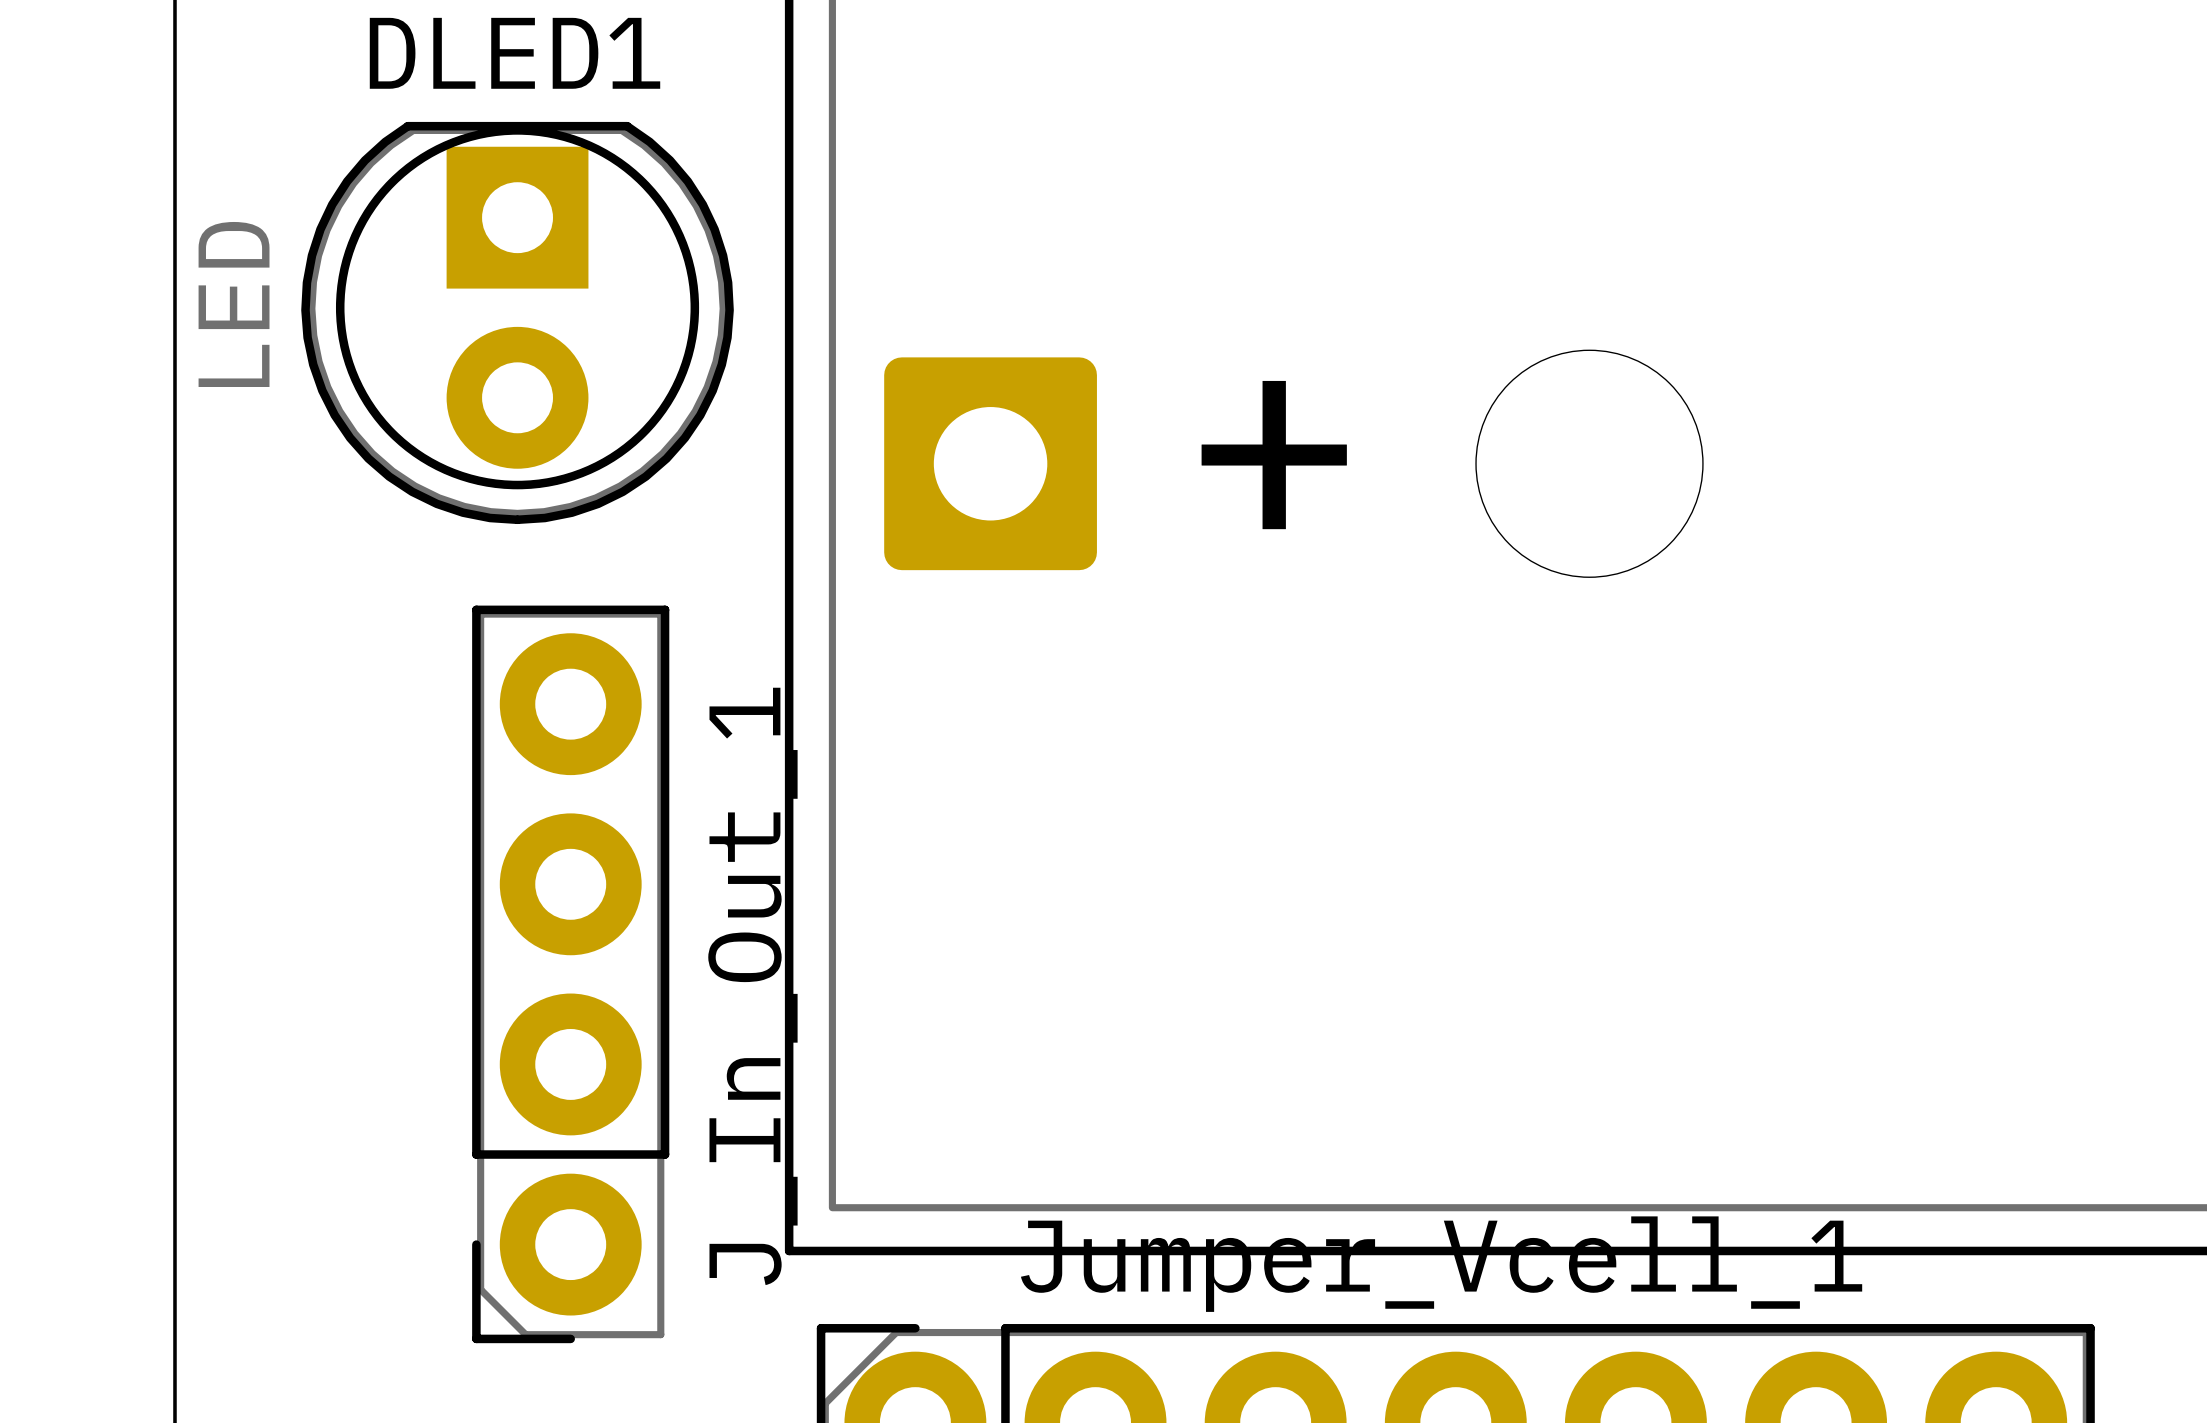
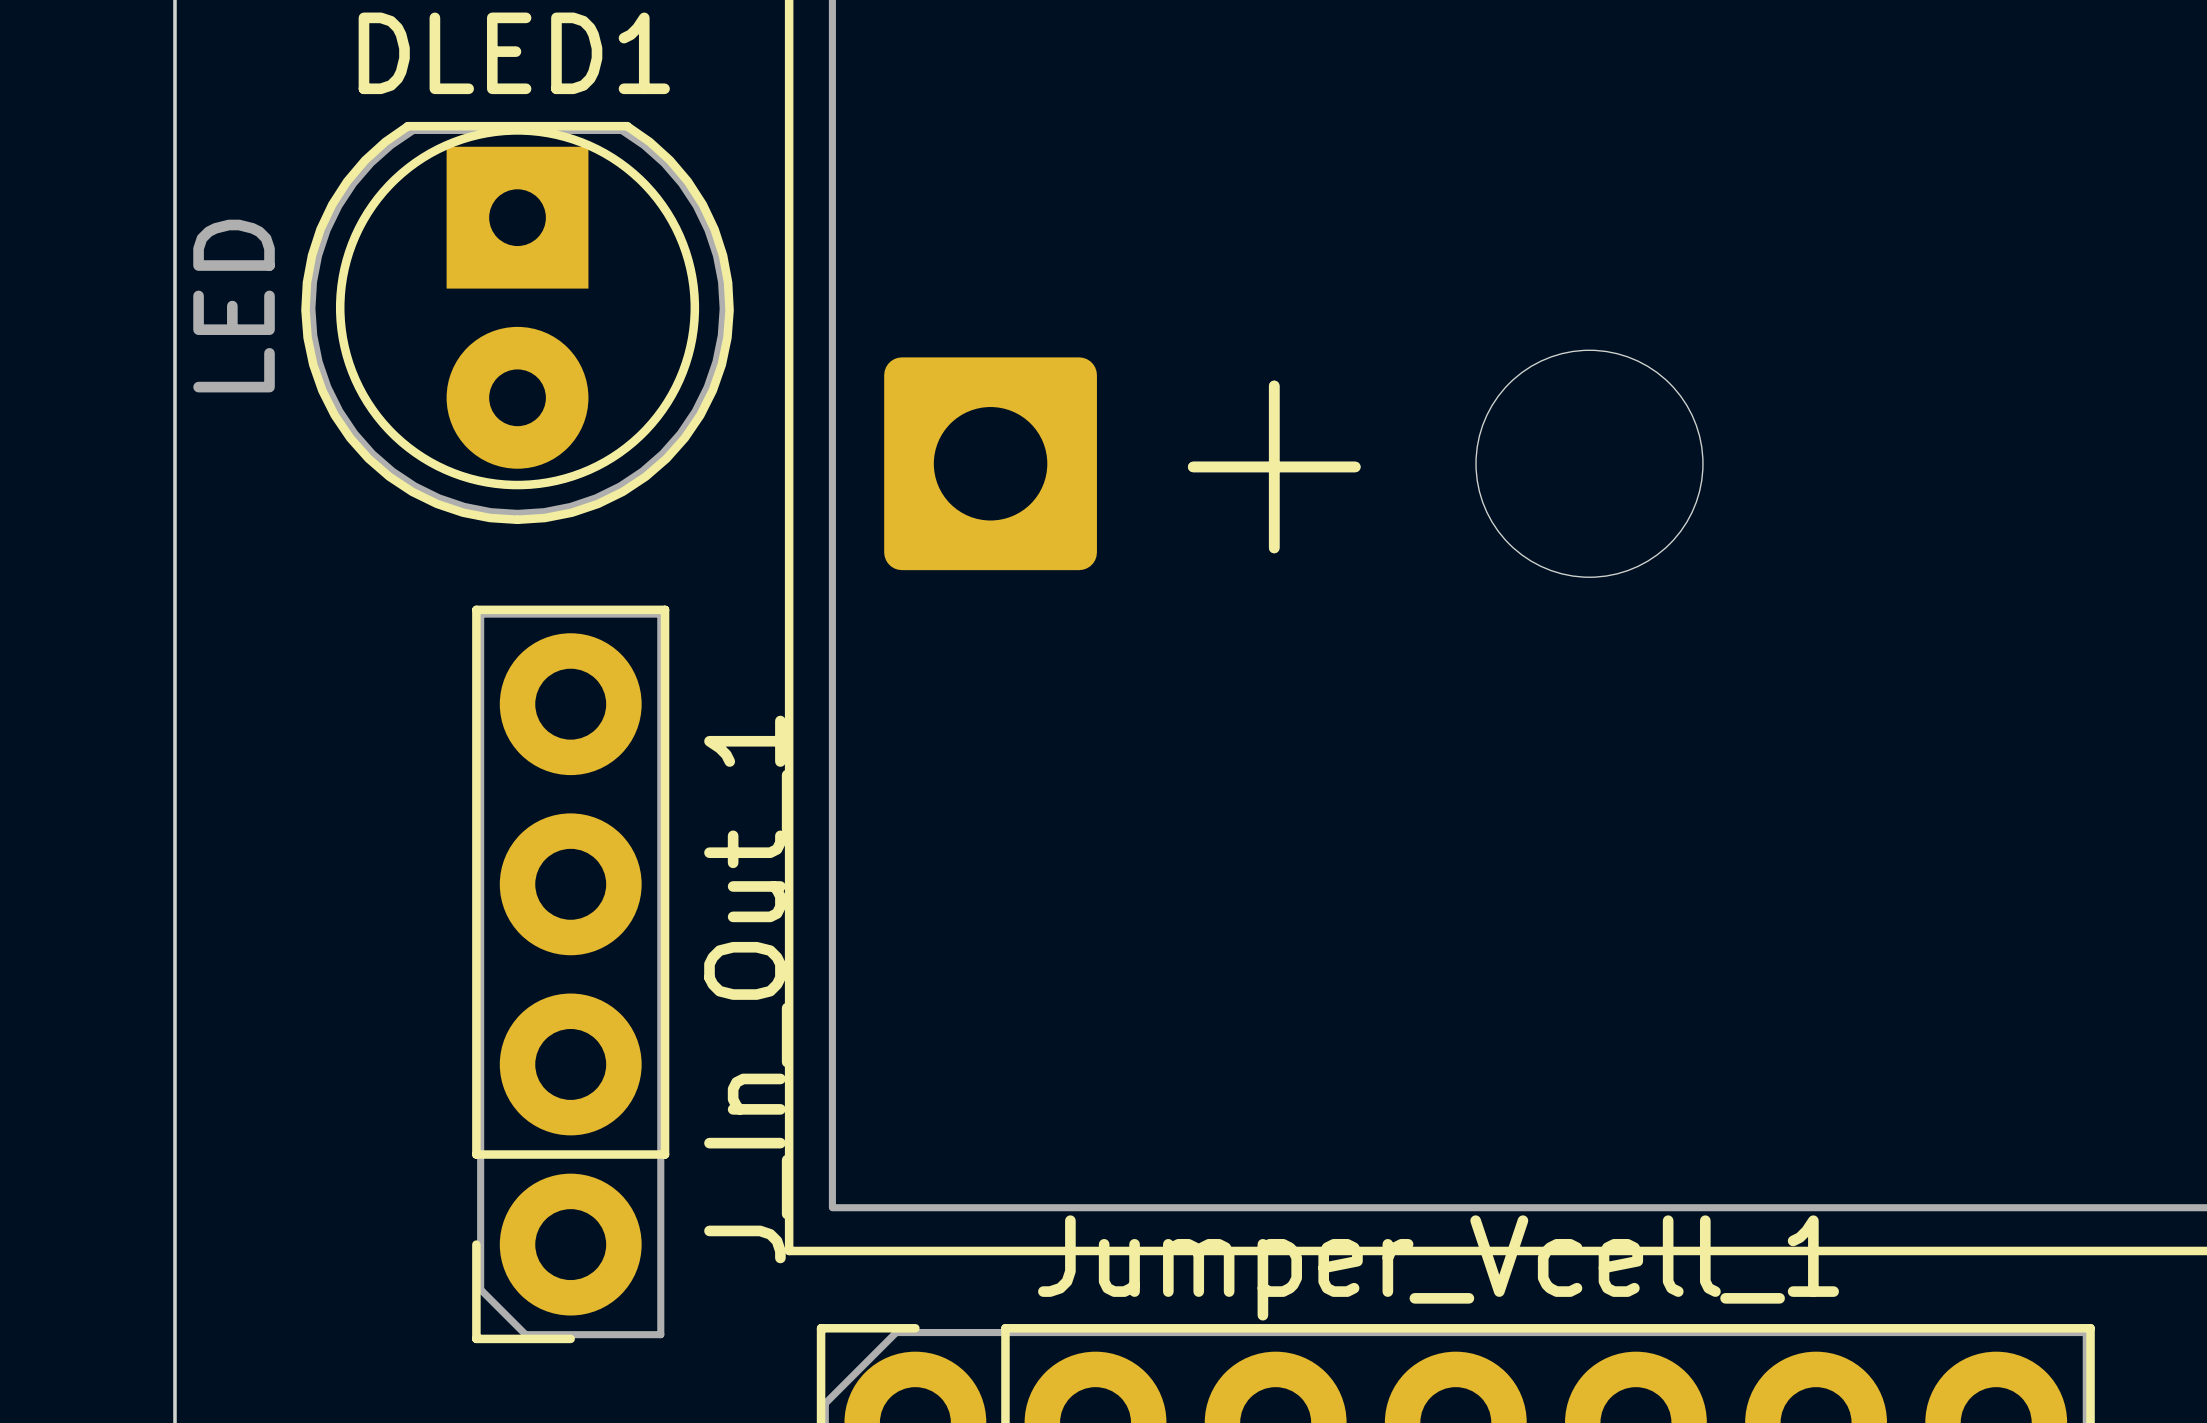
DLED1 footprint: [301, 121, 734, 525] -> [301, 121, 734, 525]

